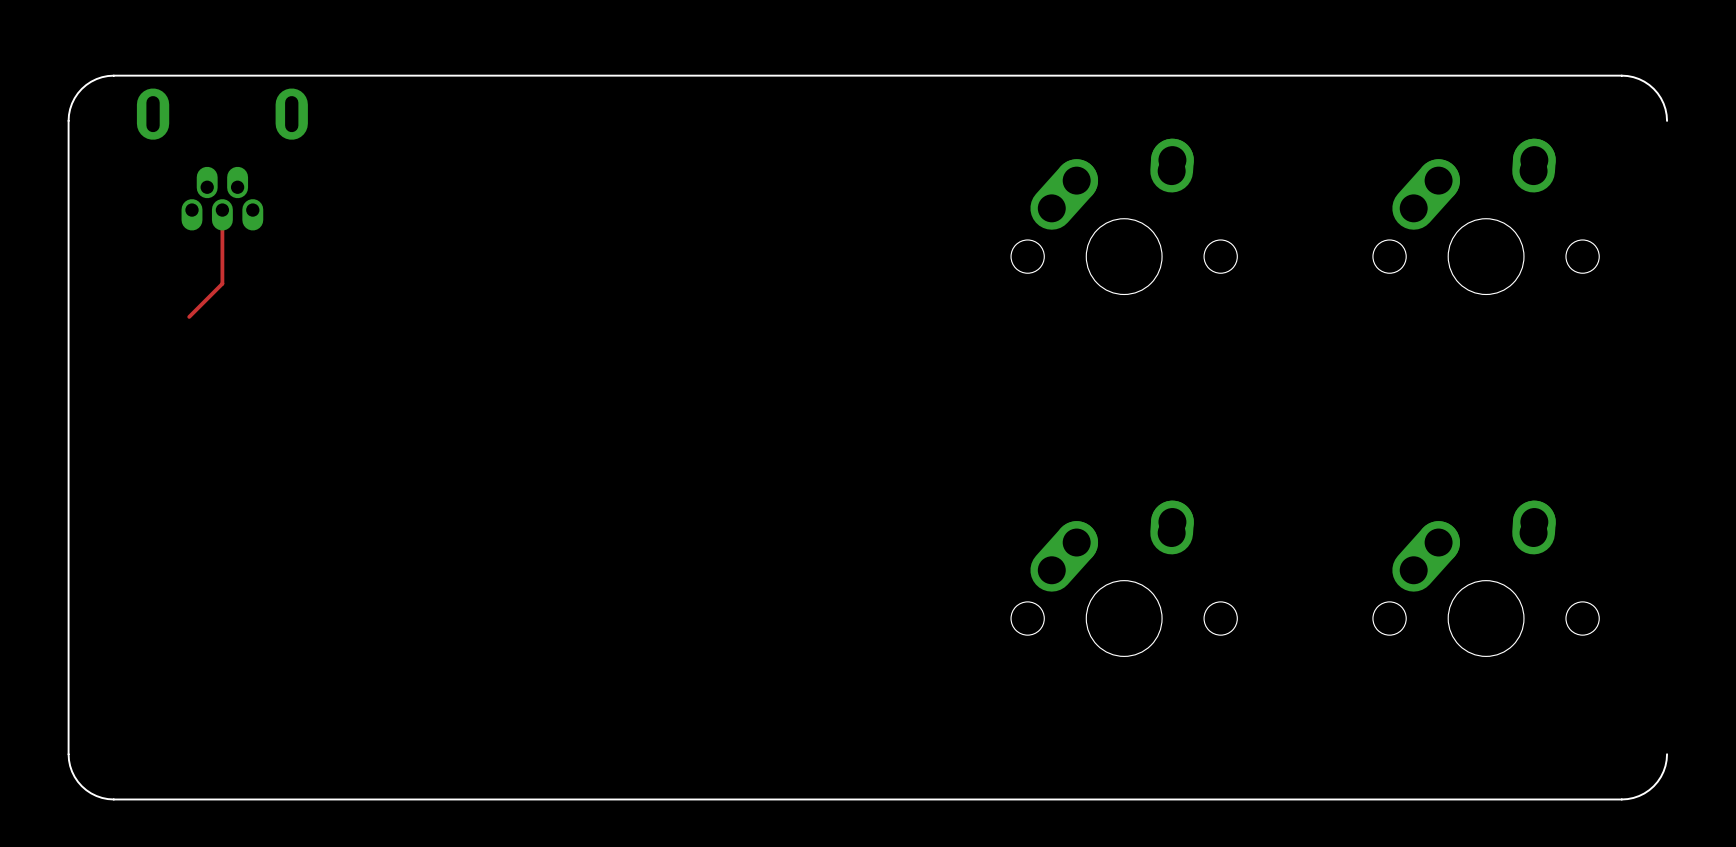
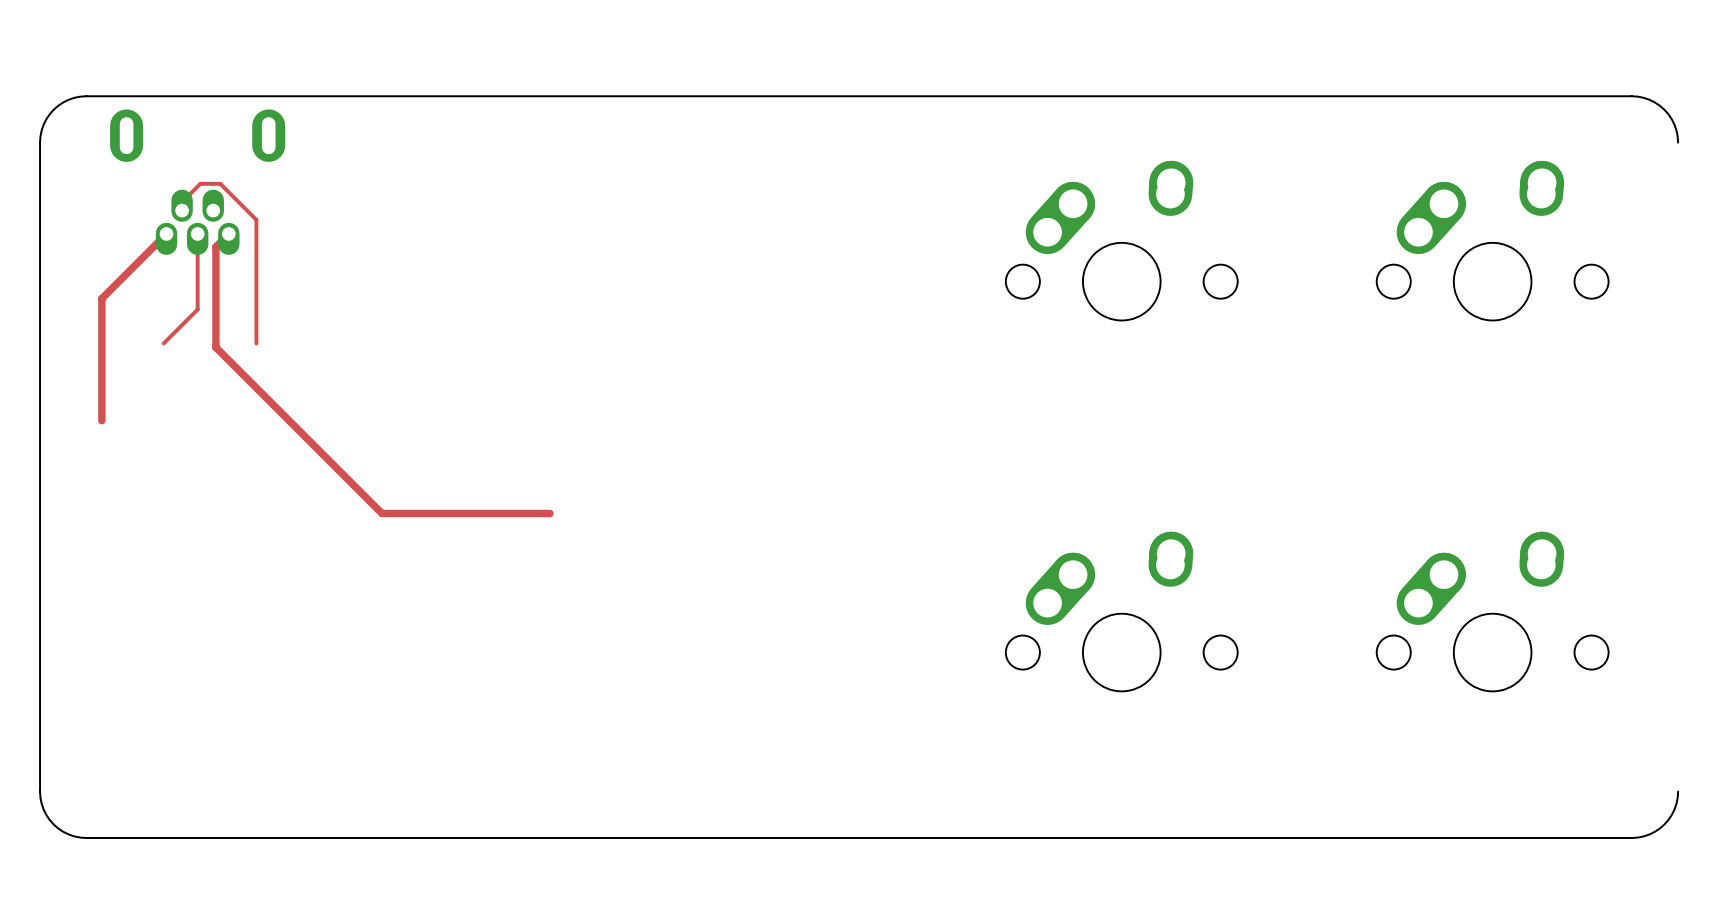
track: none -> (182, 210) (182, 202) (200, 183) (220, 183) (256, 219) (256, 343)
track: none -> (166, 233) (101, 298) (101, 420)
track: none -> (228, 233) (215, 246) (215, 347) (381, 513) (550, 513)

